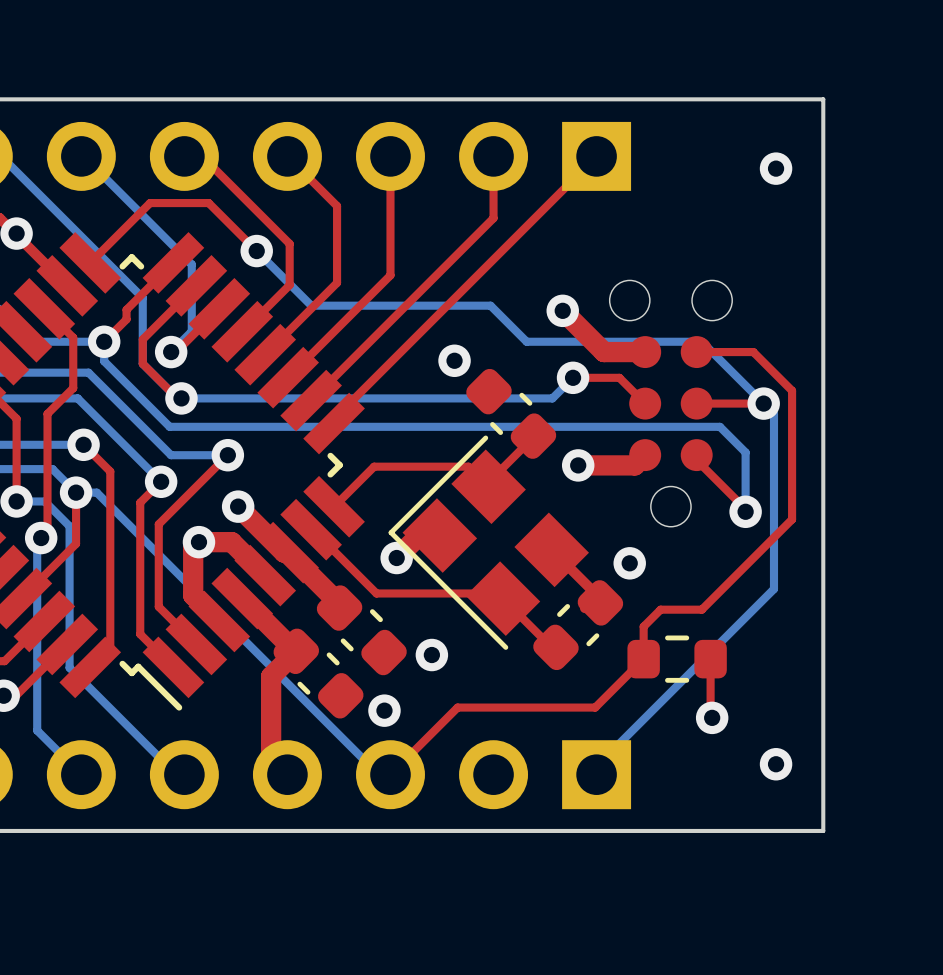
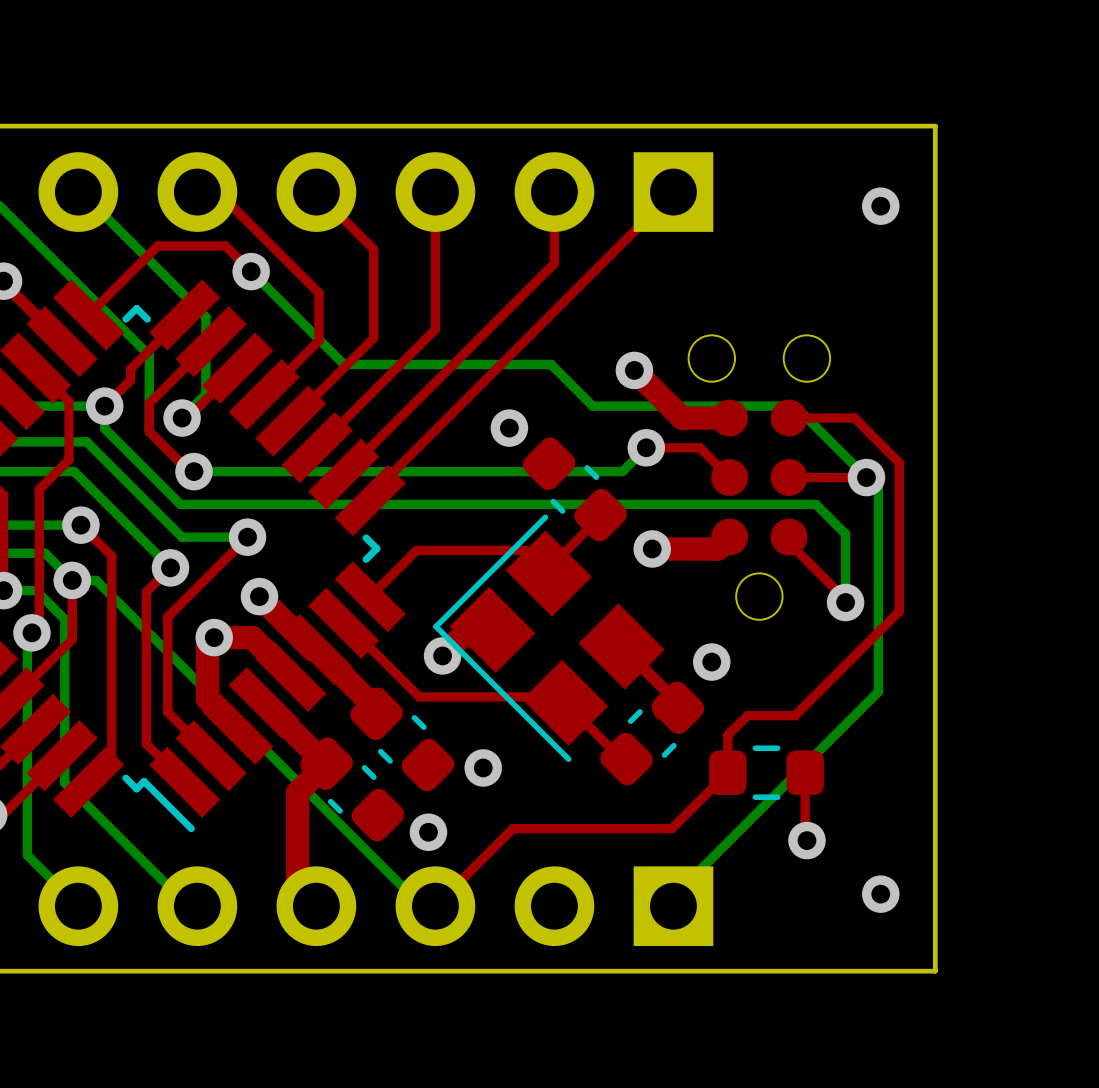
top track: (230, 225) (256, 251) -> none
bottom track: none -> (251, 271) (280, 301)
via position: (256, 251) -> (251, 271)

